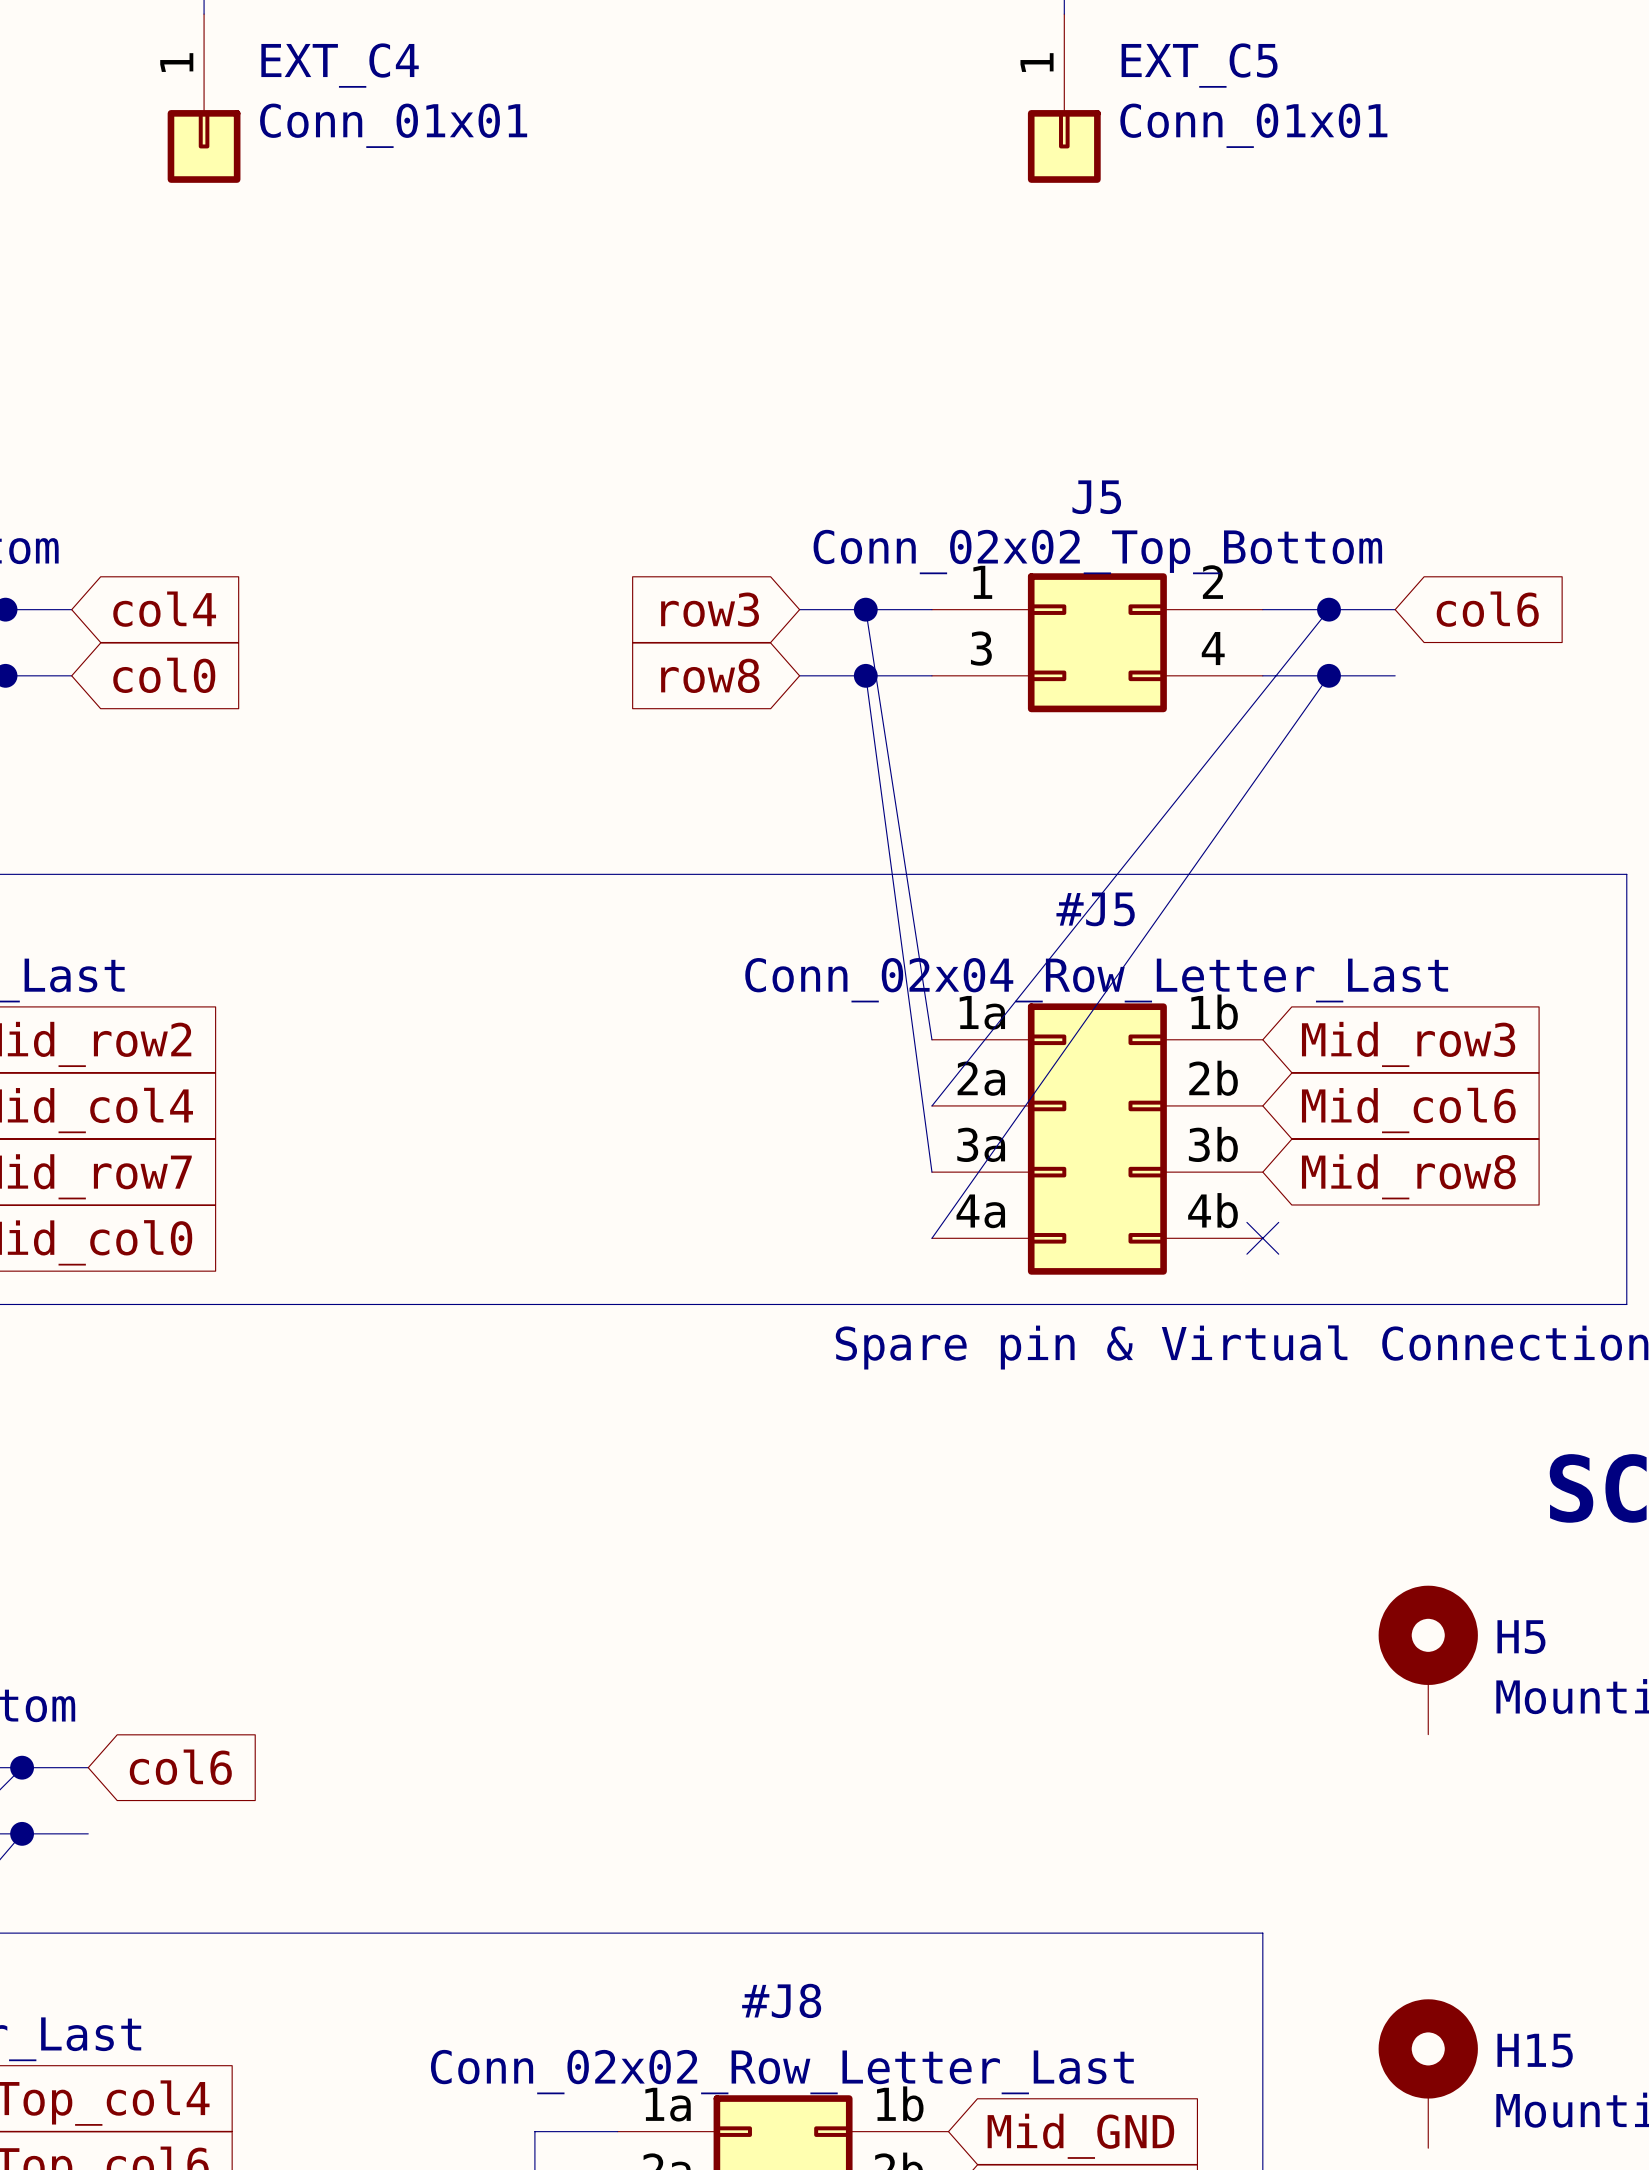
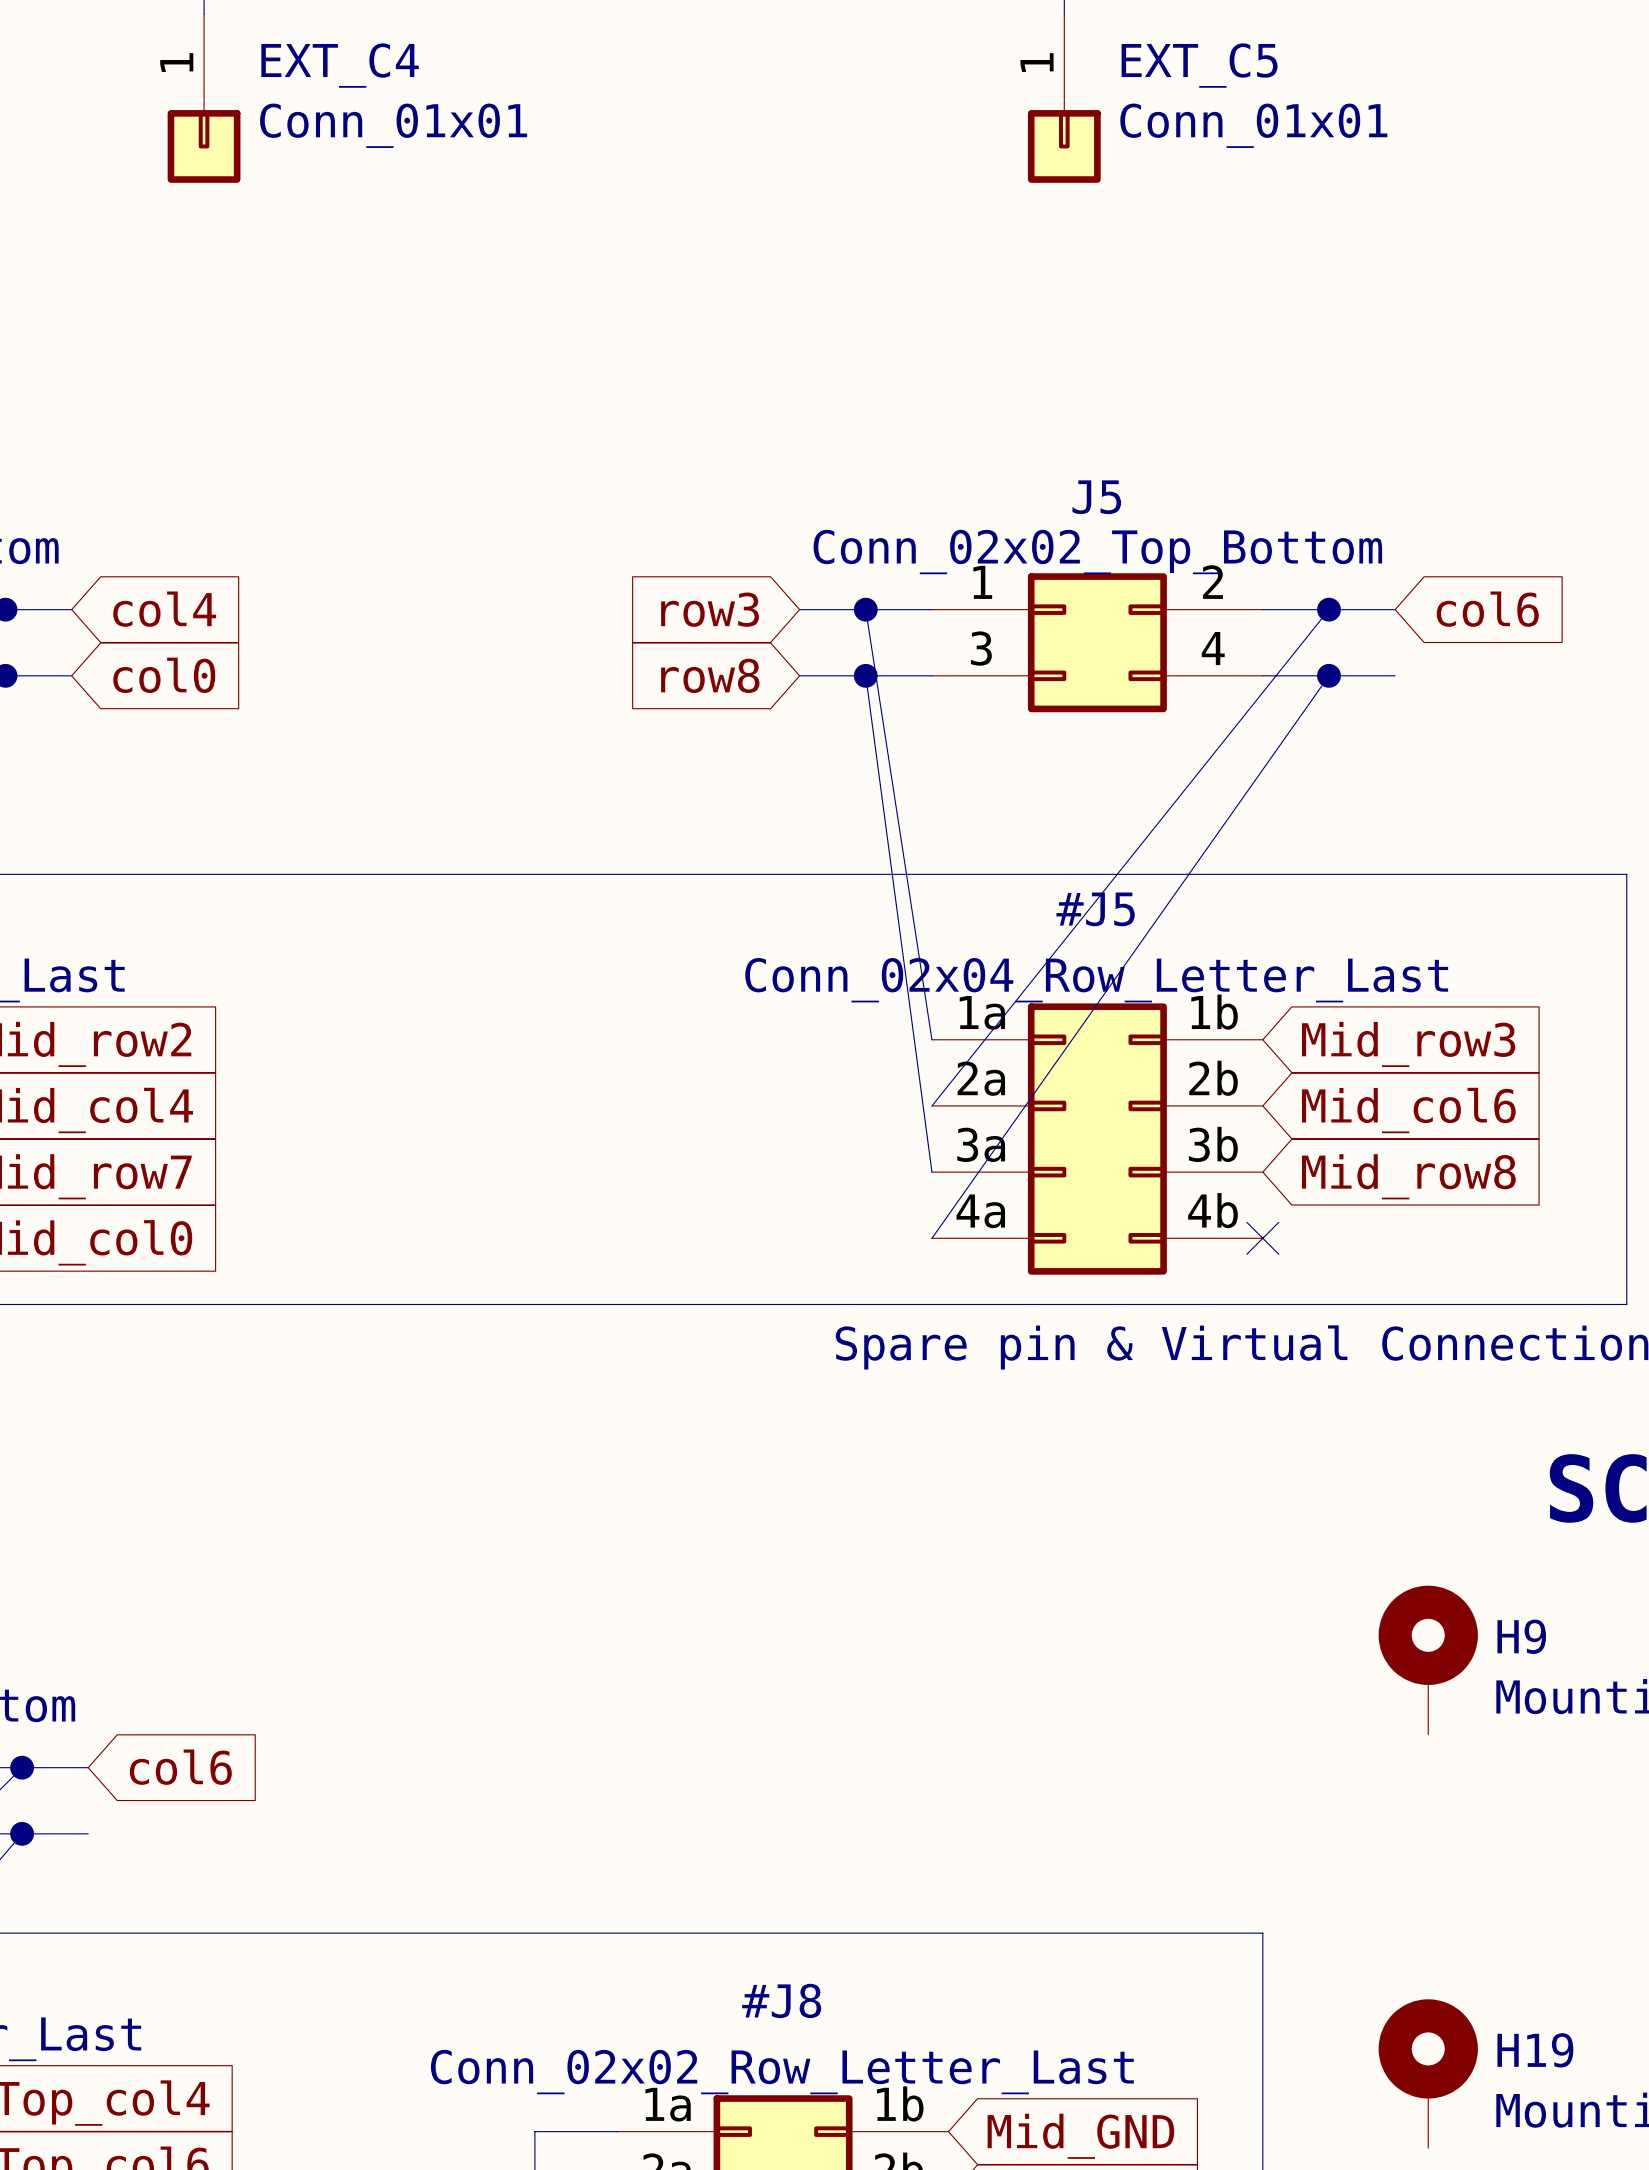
H5 name: H5 (1521, 1637) -> H9 (1521, 1636)
H15 name: H15 (1535, 2050) -> H19 (1535, 2050)

